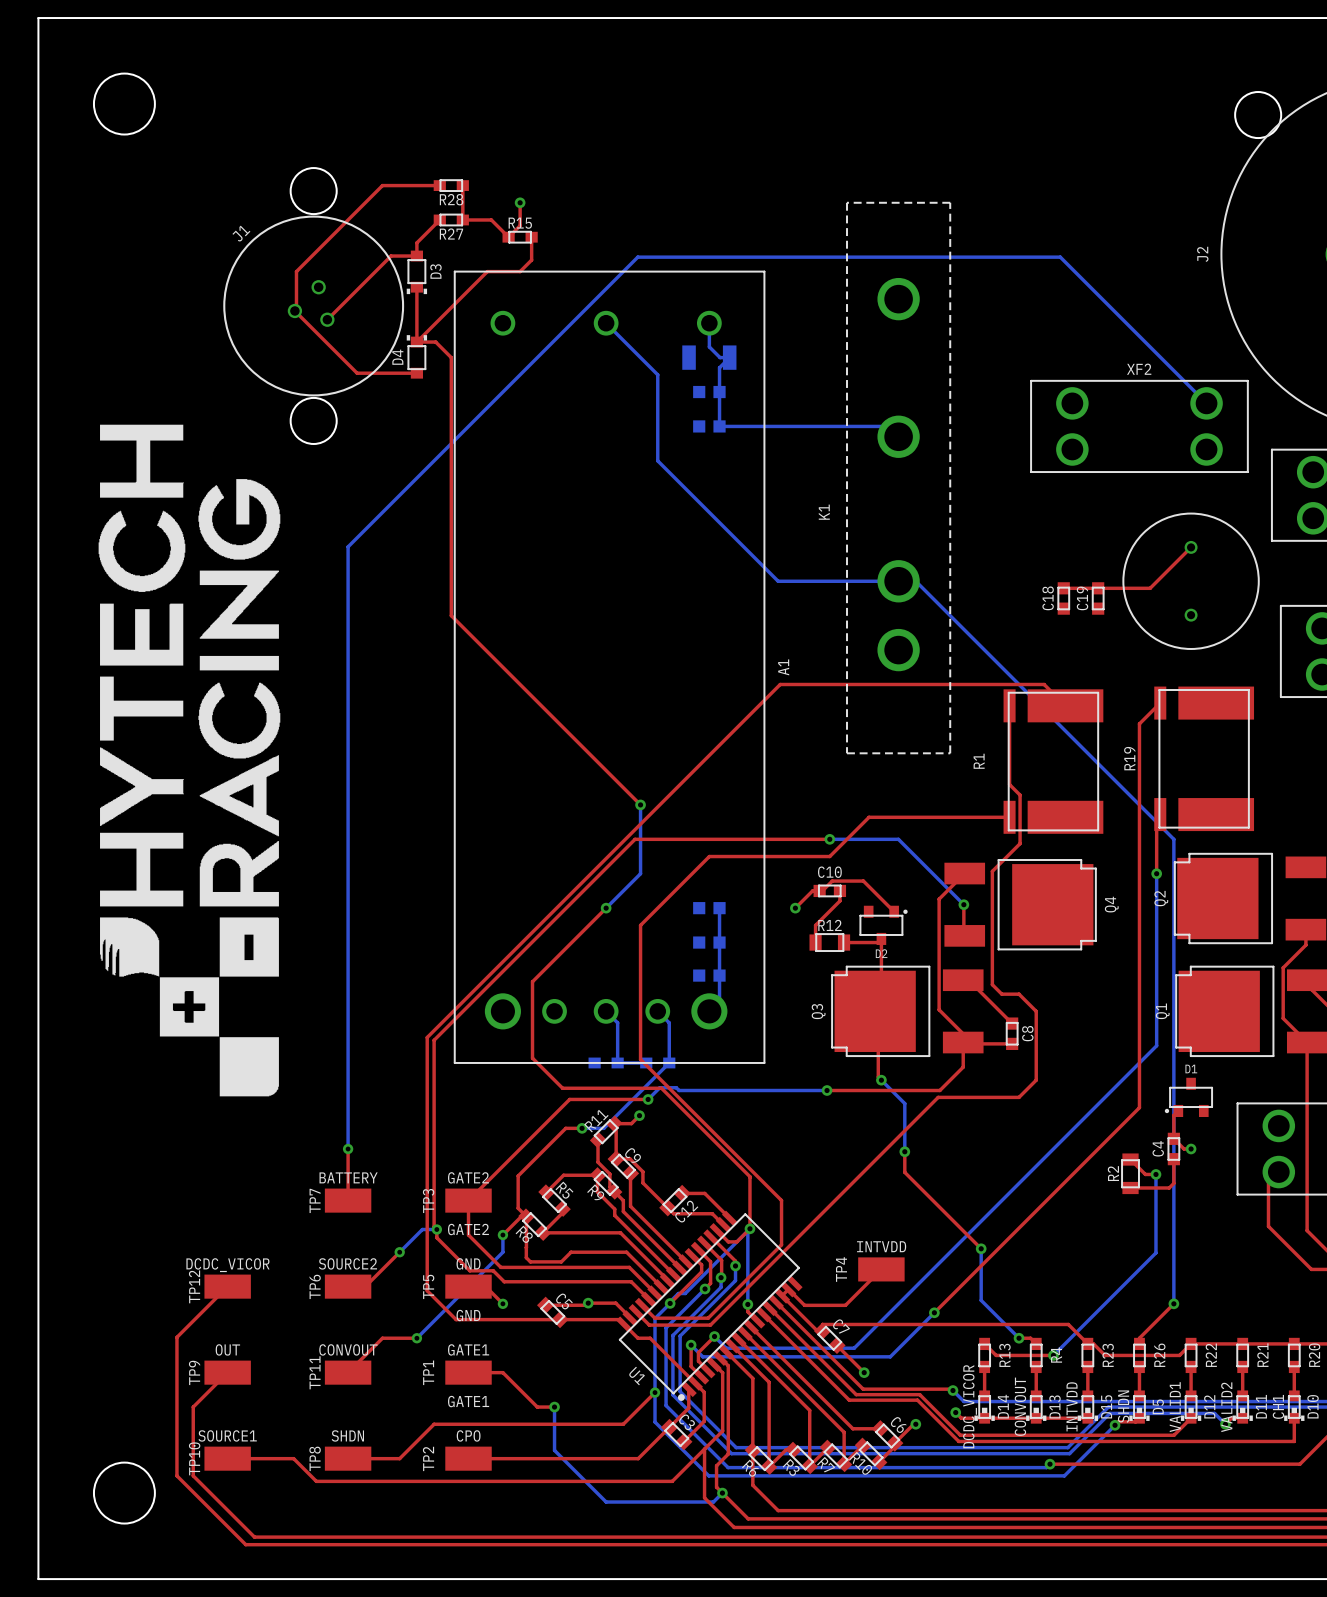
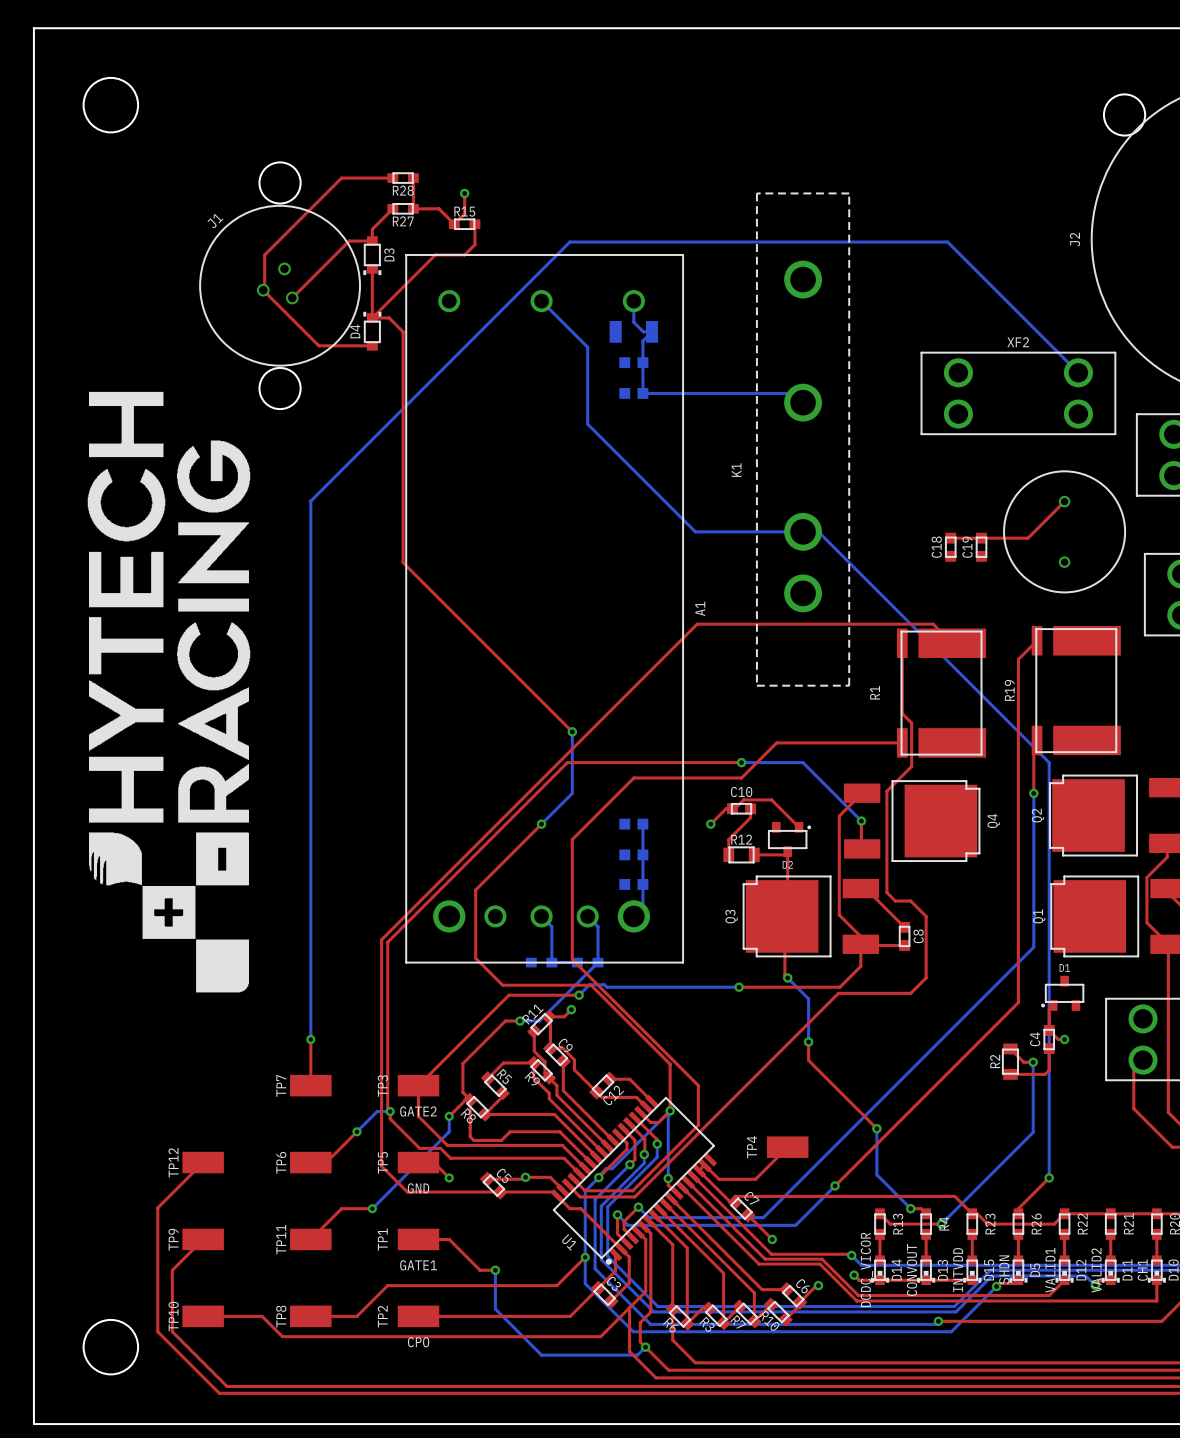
TP7 text: BATTERY (348, 1177) -> none
TP3 text: GATE2 (468, 1177) -> none
TP4 text: INTVDD (881, 1246) -> none
TP6 text: SOURCE2 (347, 1263) -> none
TP5 text: GND (468, 1263) -> none
TP12 text: DCDC_VICOR (227, 1265) -> none
TP9 text: OUT (227, 1349) -> none
TP11 text: CONVOUT (348, 1349) -> none
TP1 text: GATE1 (468, 1349) -> none
TP10 text: SOURCE1 (227, 1435) -> none
TP8 text: SHDN (347, 1435) -> none
TP2 text: CPO (468, 1435) -> none
text: none -> CPO (418, 1342)

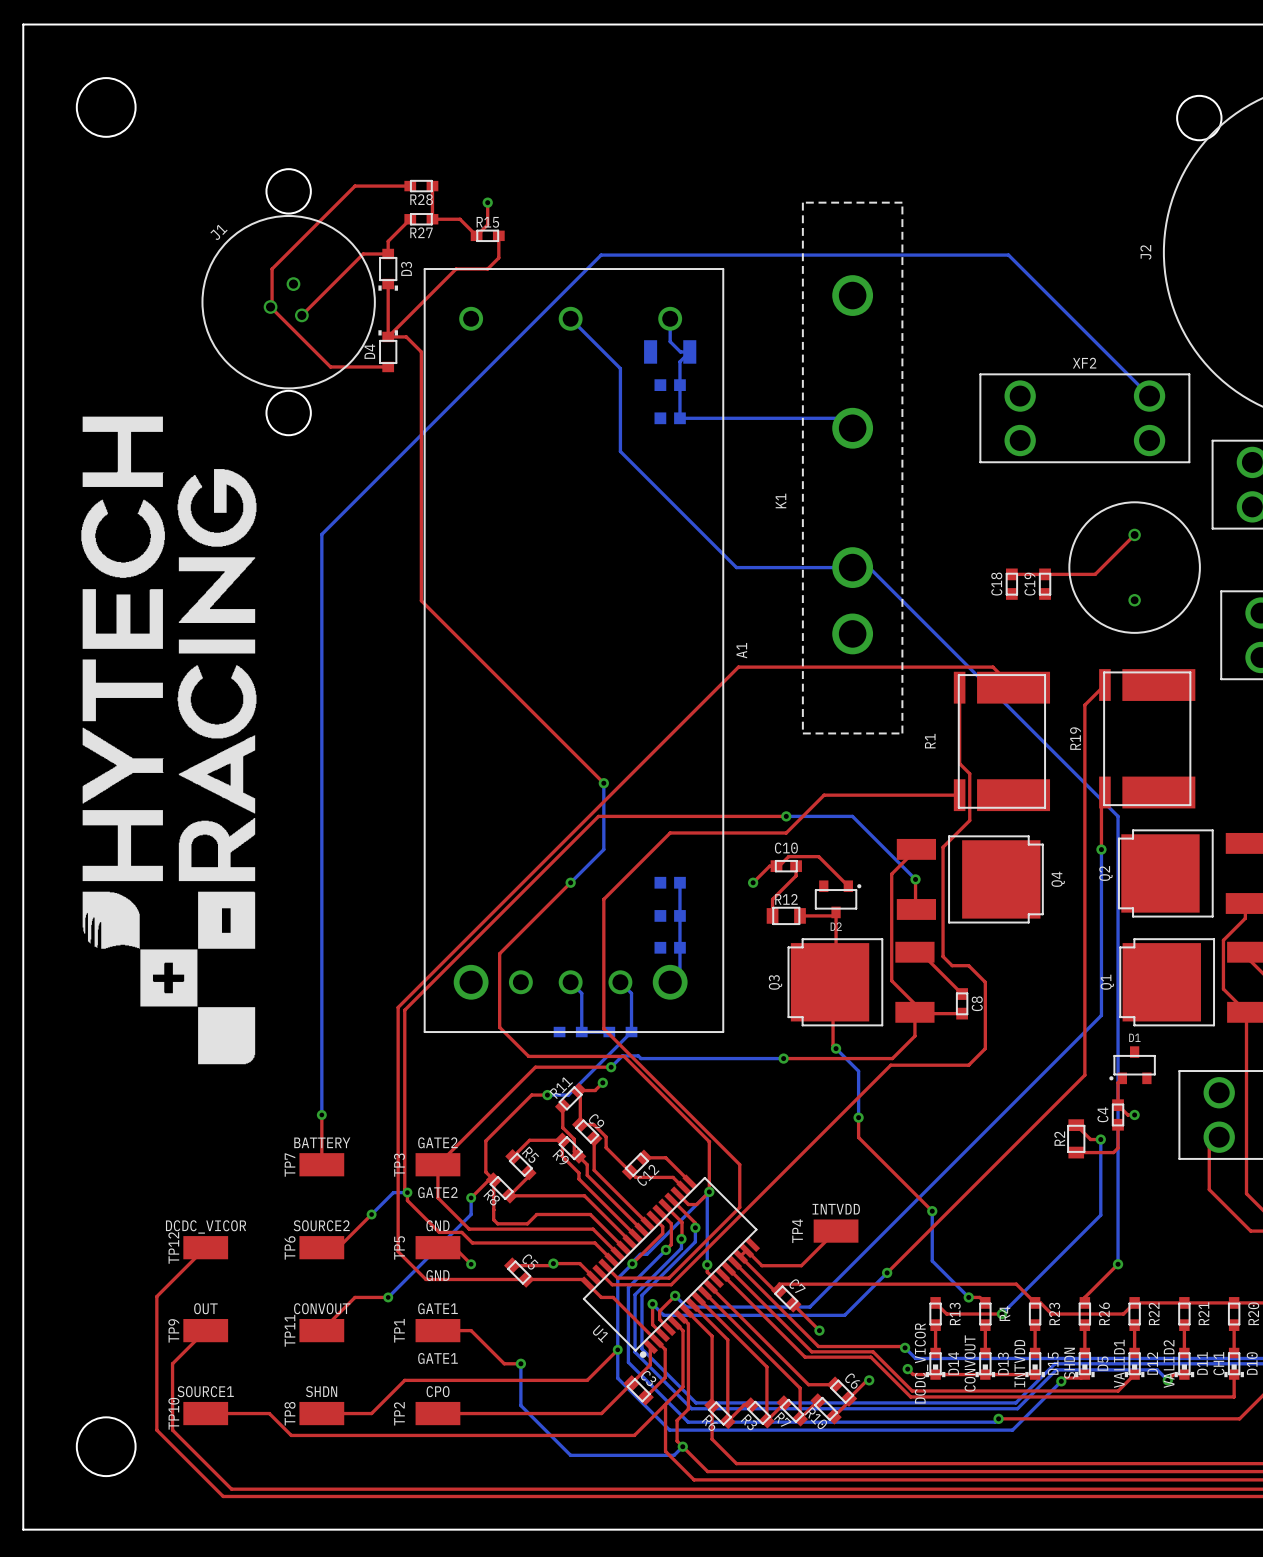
TP7 text: none -> BATTERY (322, 1142)
TP3 text: none -> GATE2 (437, 1142)
TP4 text: none -> INTVDD (836, 1209)
TP6 text: none -> SOURCE2 (321, 1225)
TP5 text: none -> GND (437, 1225)
TP12 text: none -> DCDC_VICOR (206, 1226)
TP9 text: none -> OUT (205, 1308)
TP11 text: none -> CONVOUT (322, 1308)
TP1 text: none -> GATE1 (438, 1308)
TP10 text: none -> SOURCE1 (205, 1391)
TP8 text: none -> SHDN (321, 1391)
TP2 text: none -> CPO (438, 1391)
text: CPO (418, 1342) -> none

